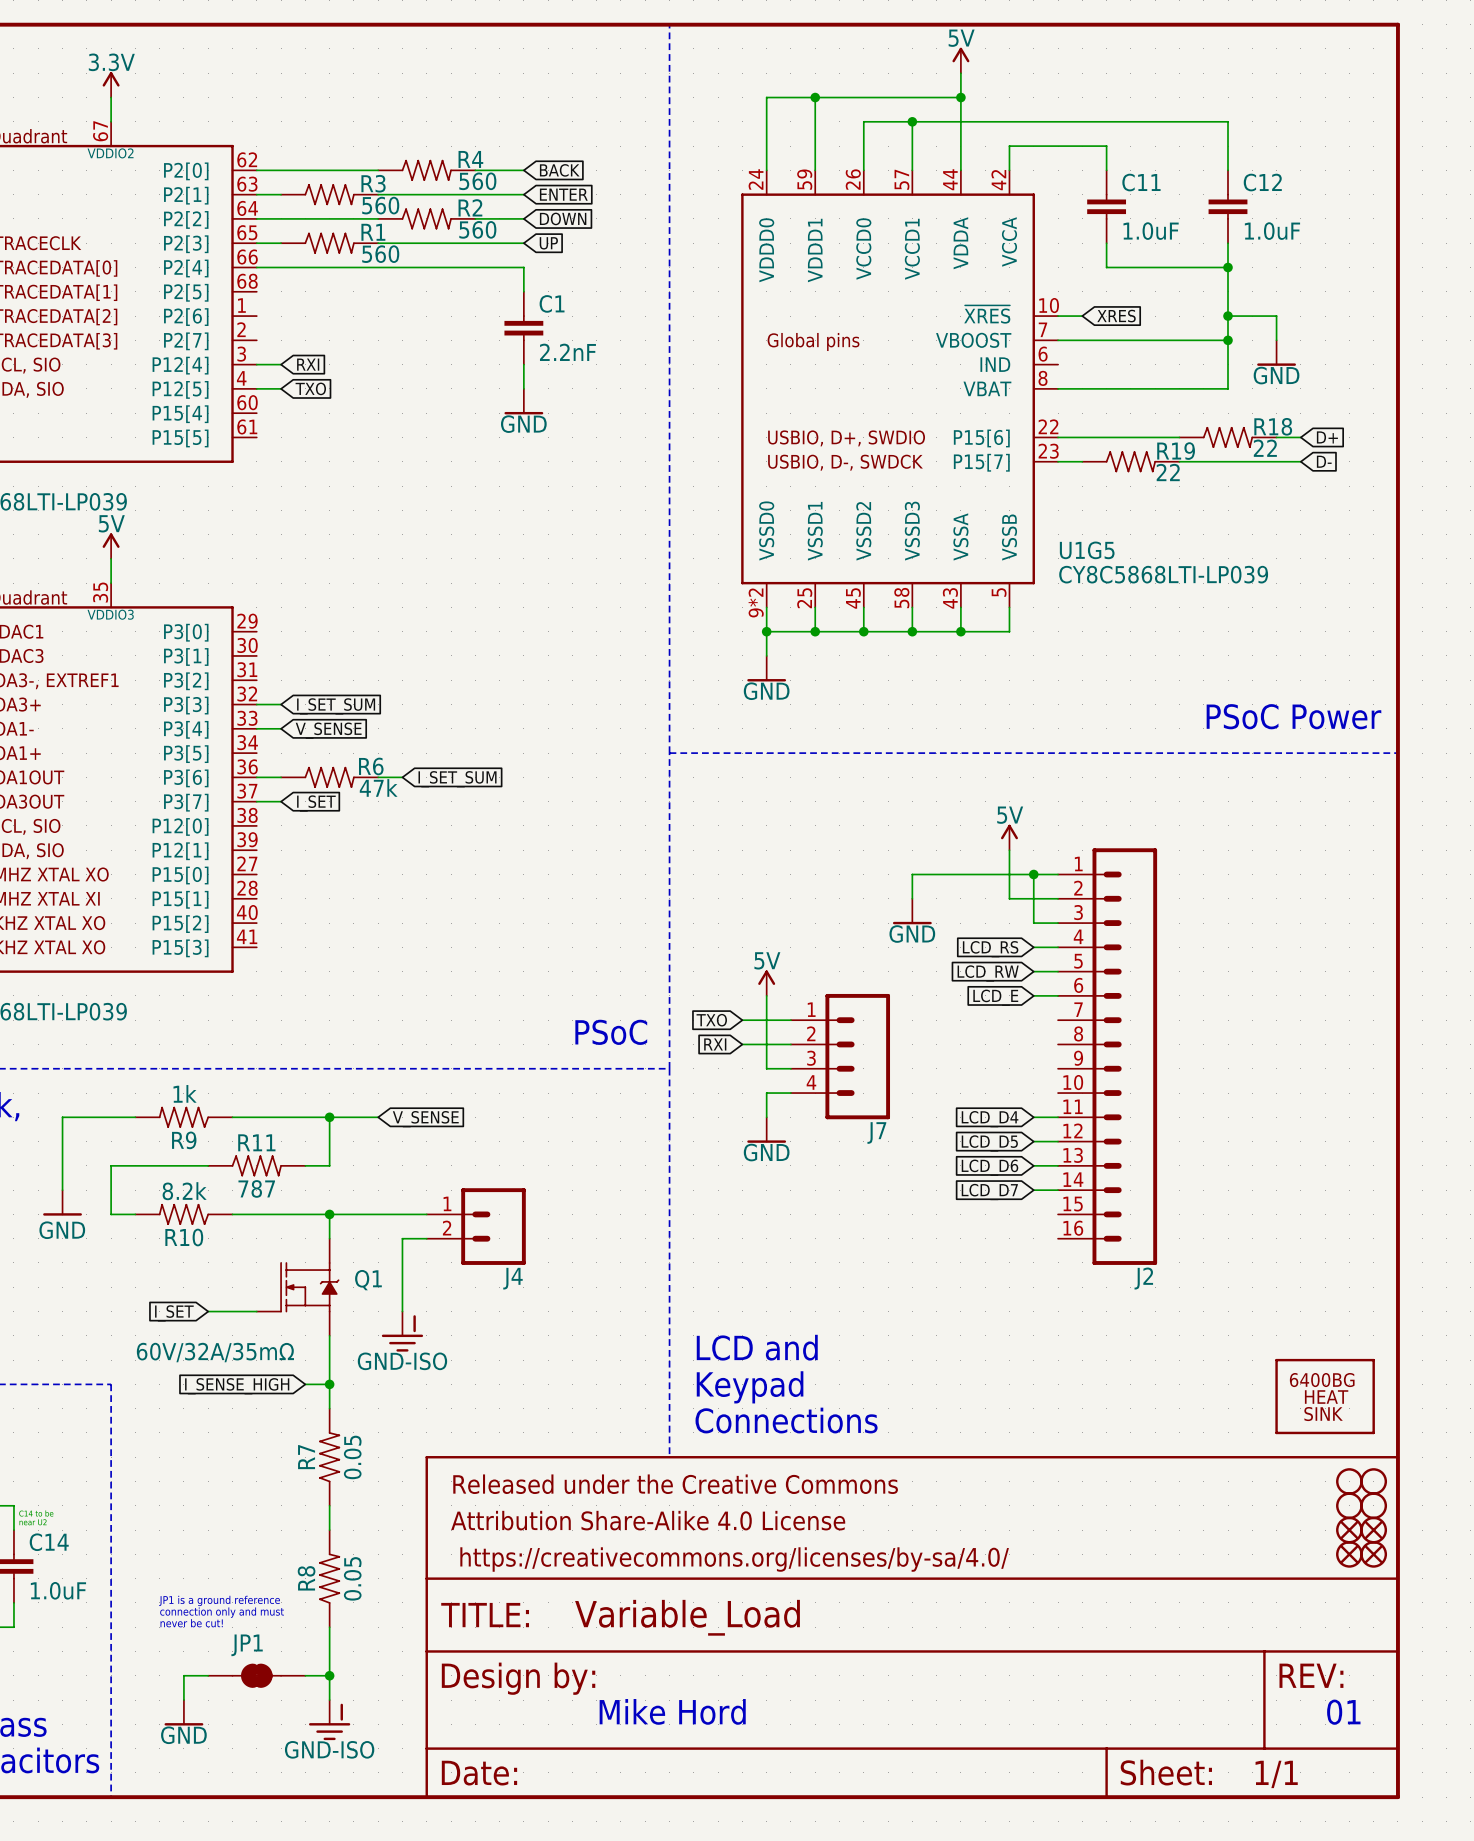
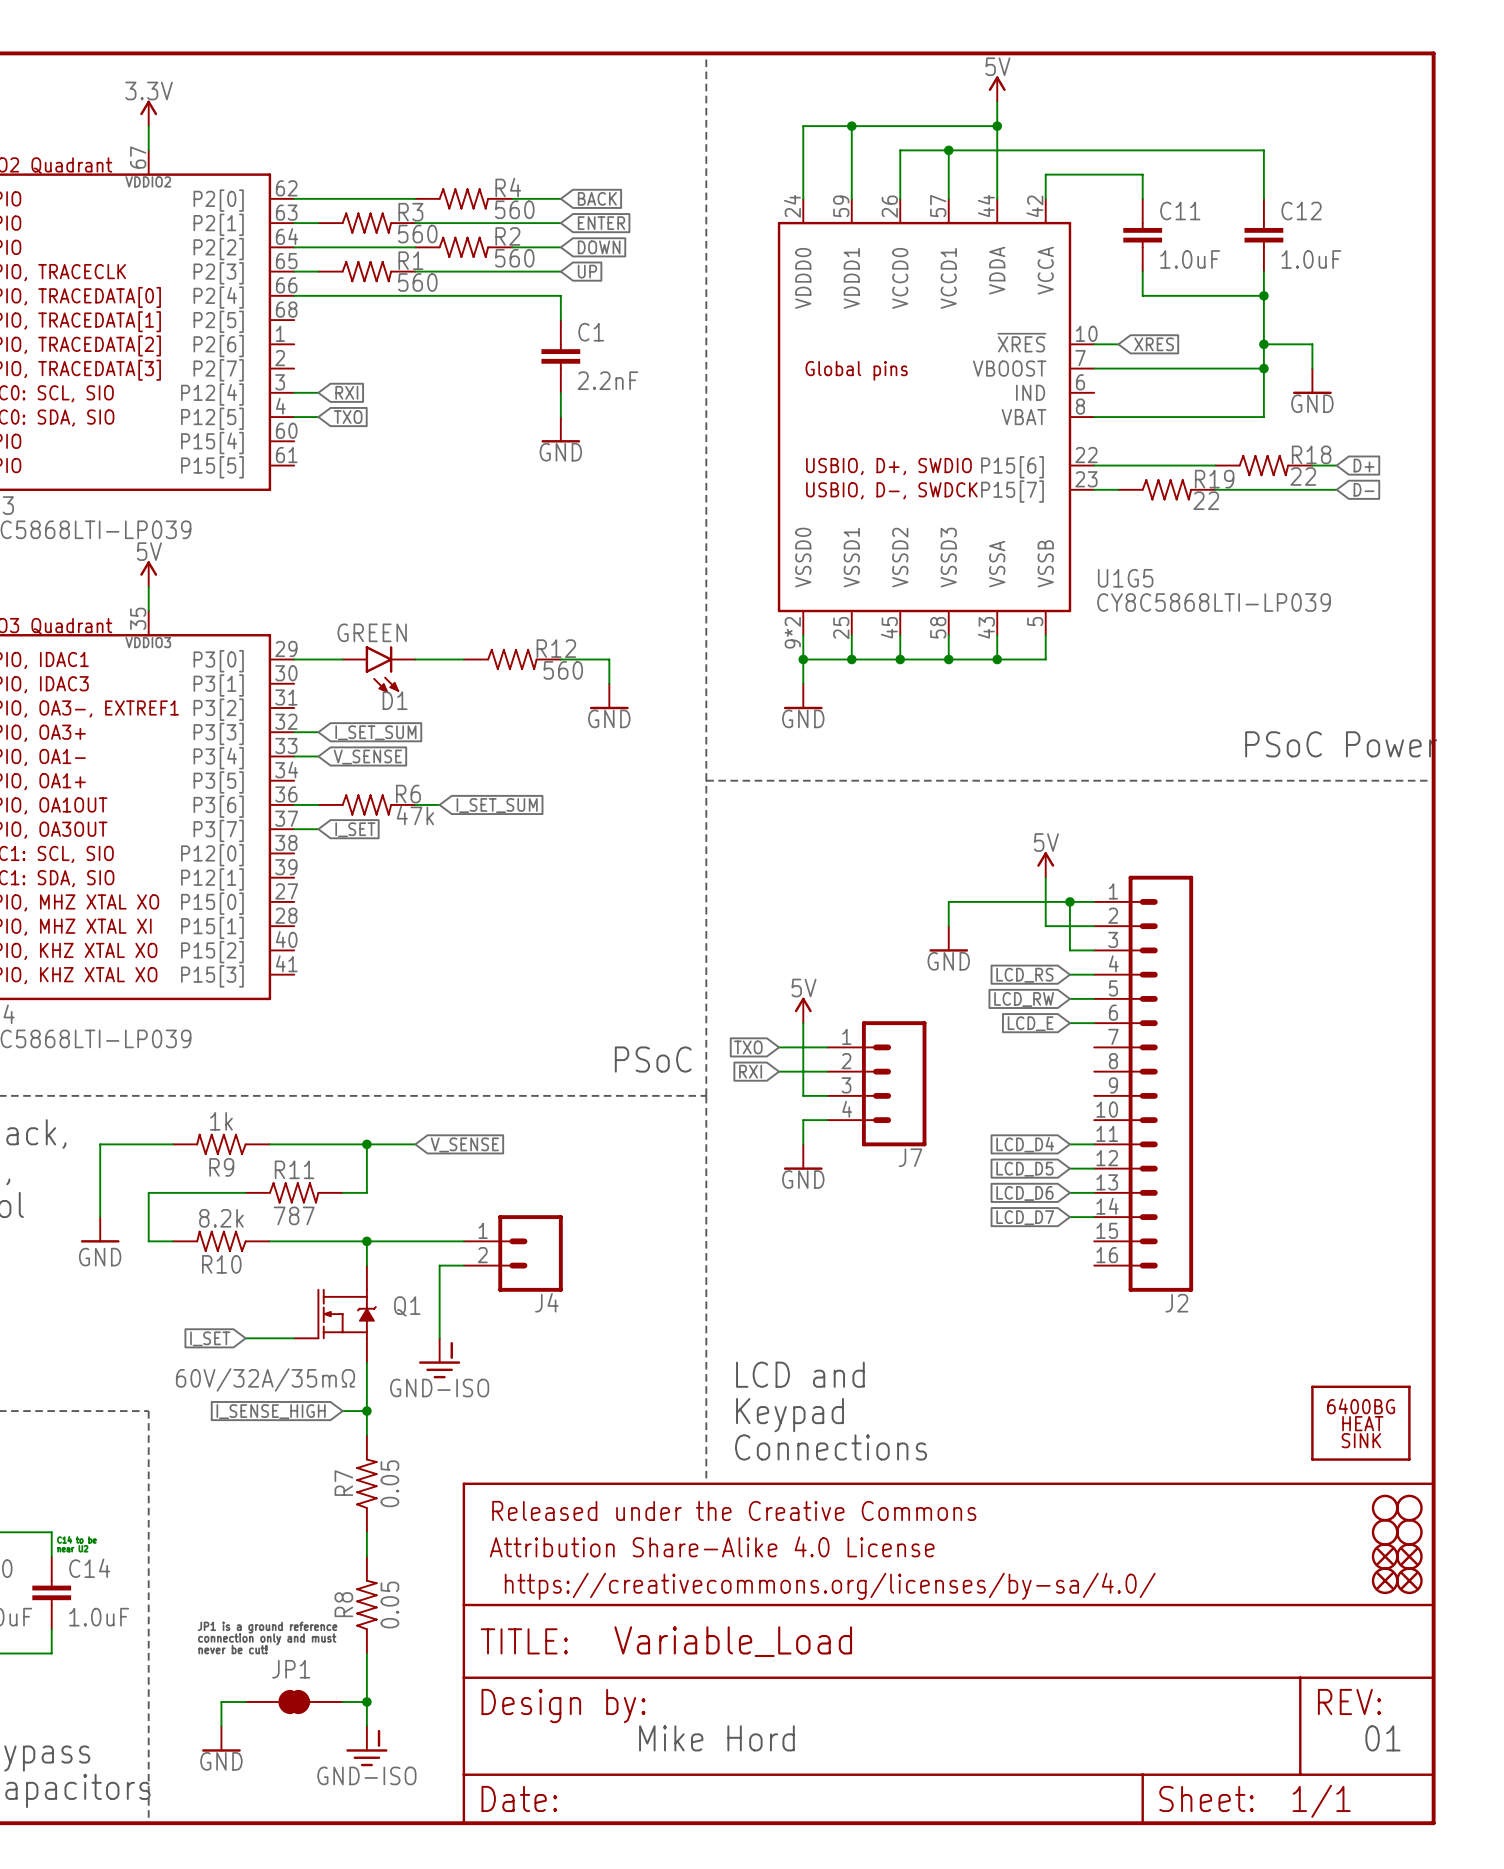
wire: none -> (294, 659) (342, 659)
wire: none -> (415, 659) (463, 659)
R12: none -> 560 (512, 659)
wire: none -> (560, 659) (609, 659) (609, 683)
D1: none -> GREEN (379, 669)
power symbol: none -> GND (609, 696)

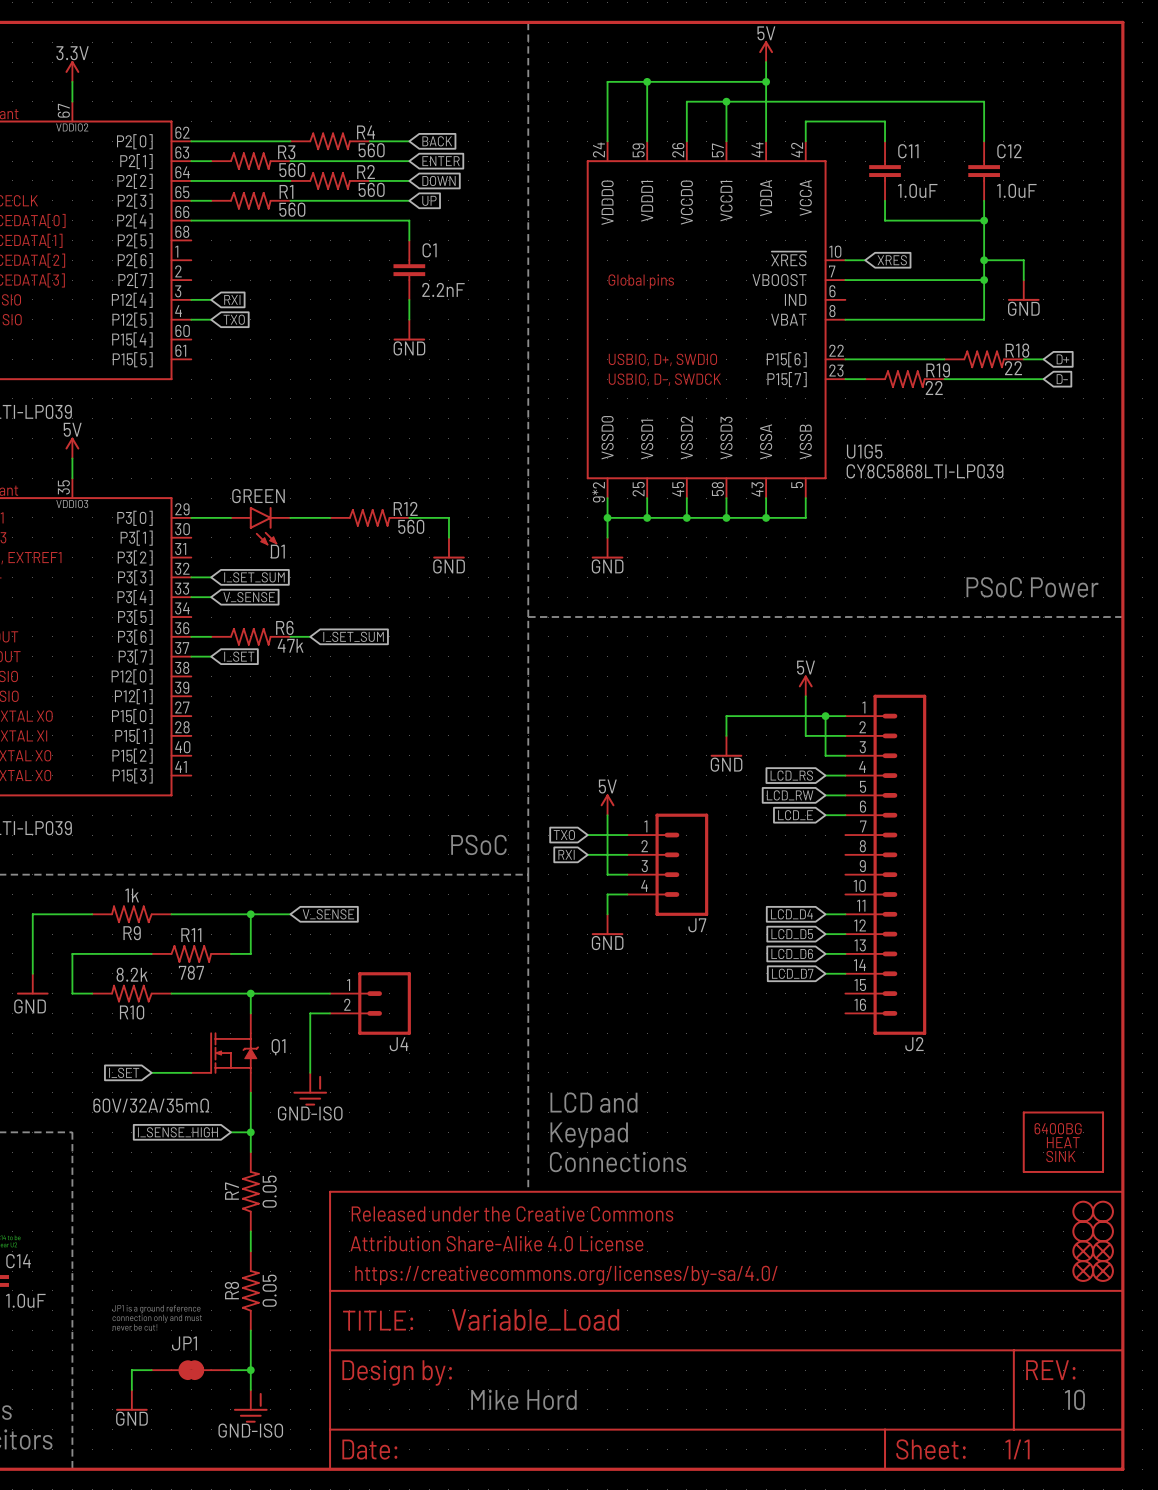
text: 01 (1382, 1738) -> 10 (1074, 1399)

